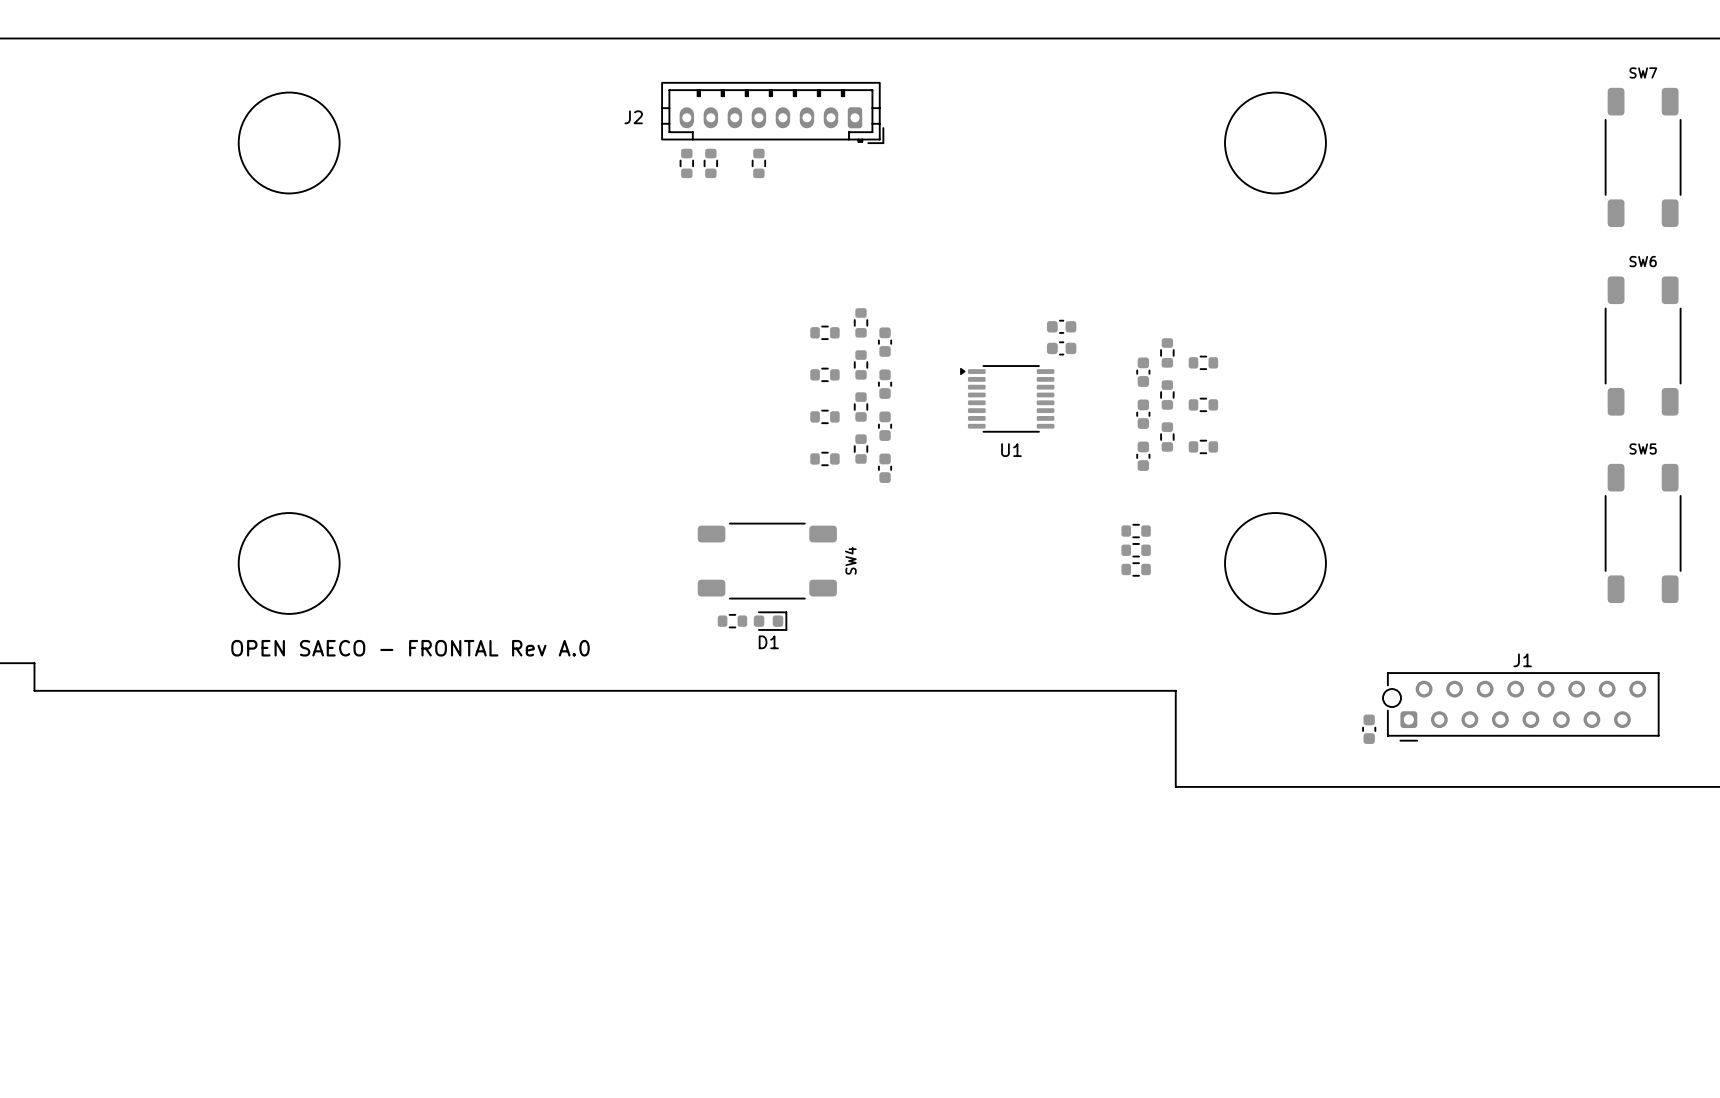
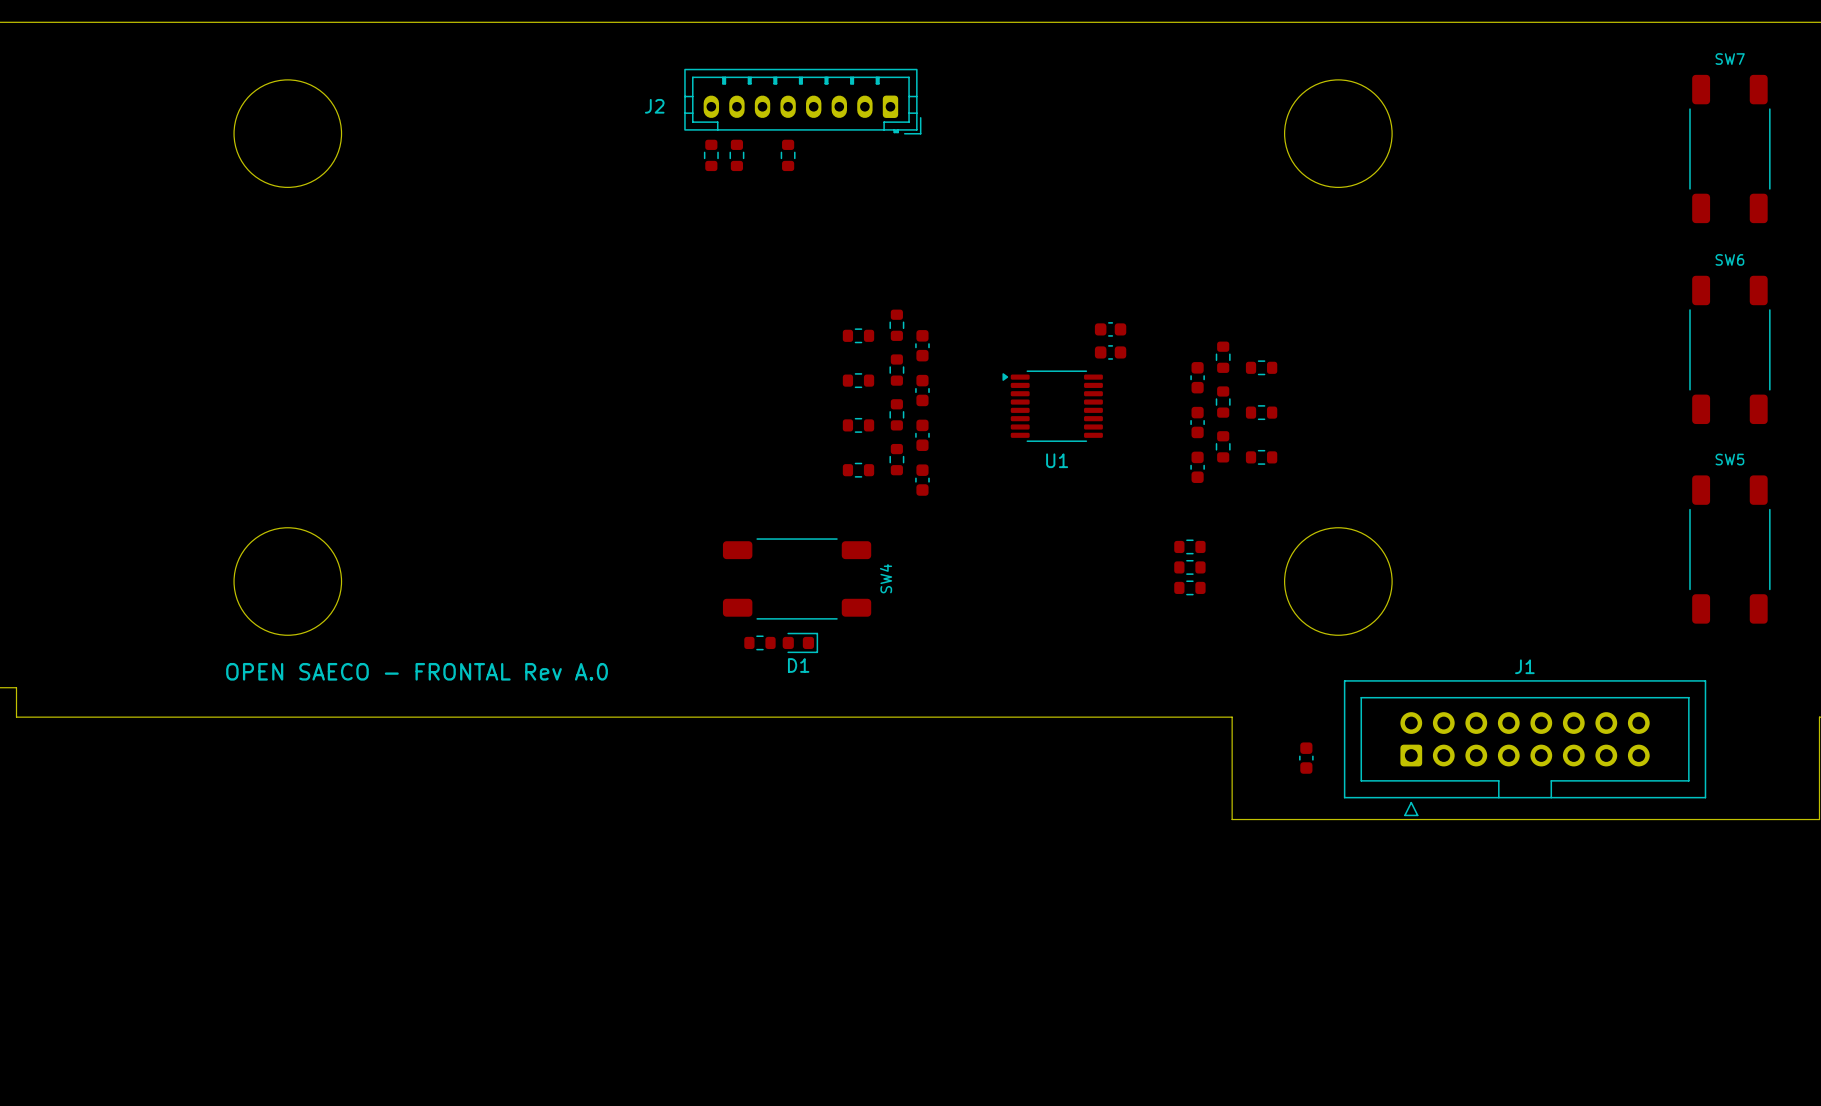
J1 name position: J1 (1522, 660) -> J1 (1524, 666)
J1 footprint: [1383, 672, 1660, 742] -> [1343, 680, 1707, 817]
part position: (1369, 729) -> (1306, 758)

